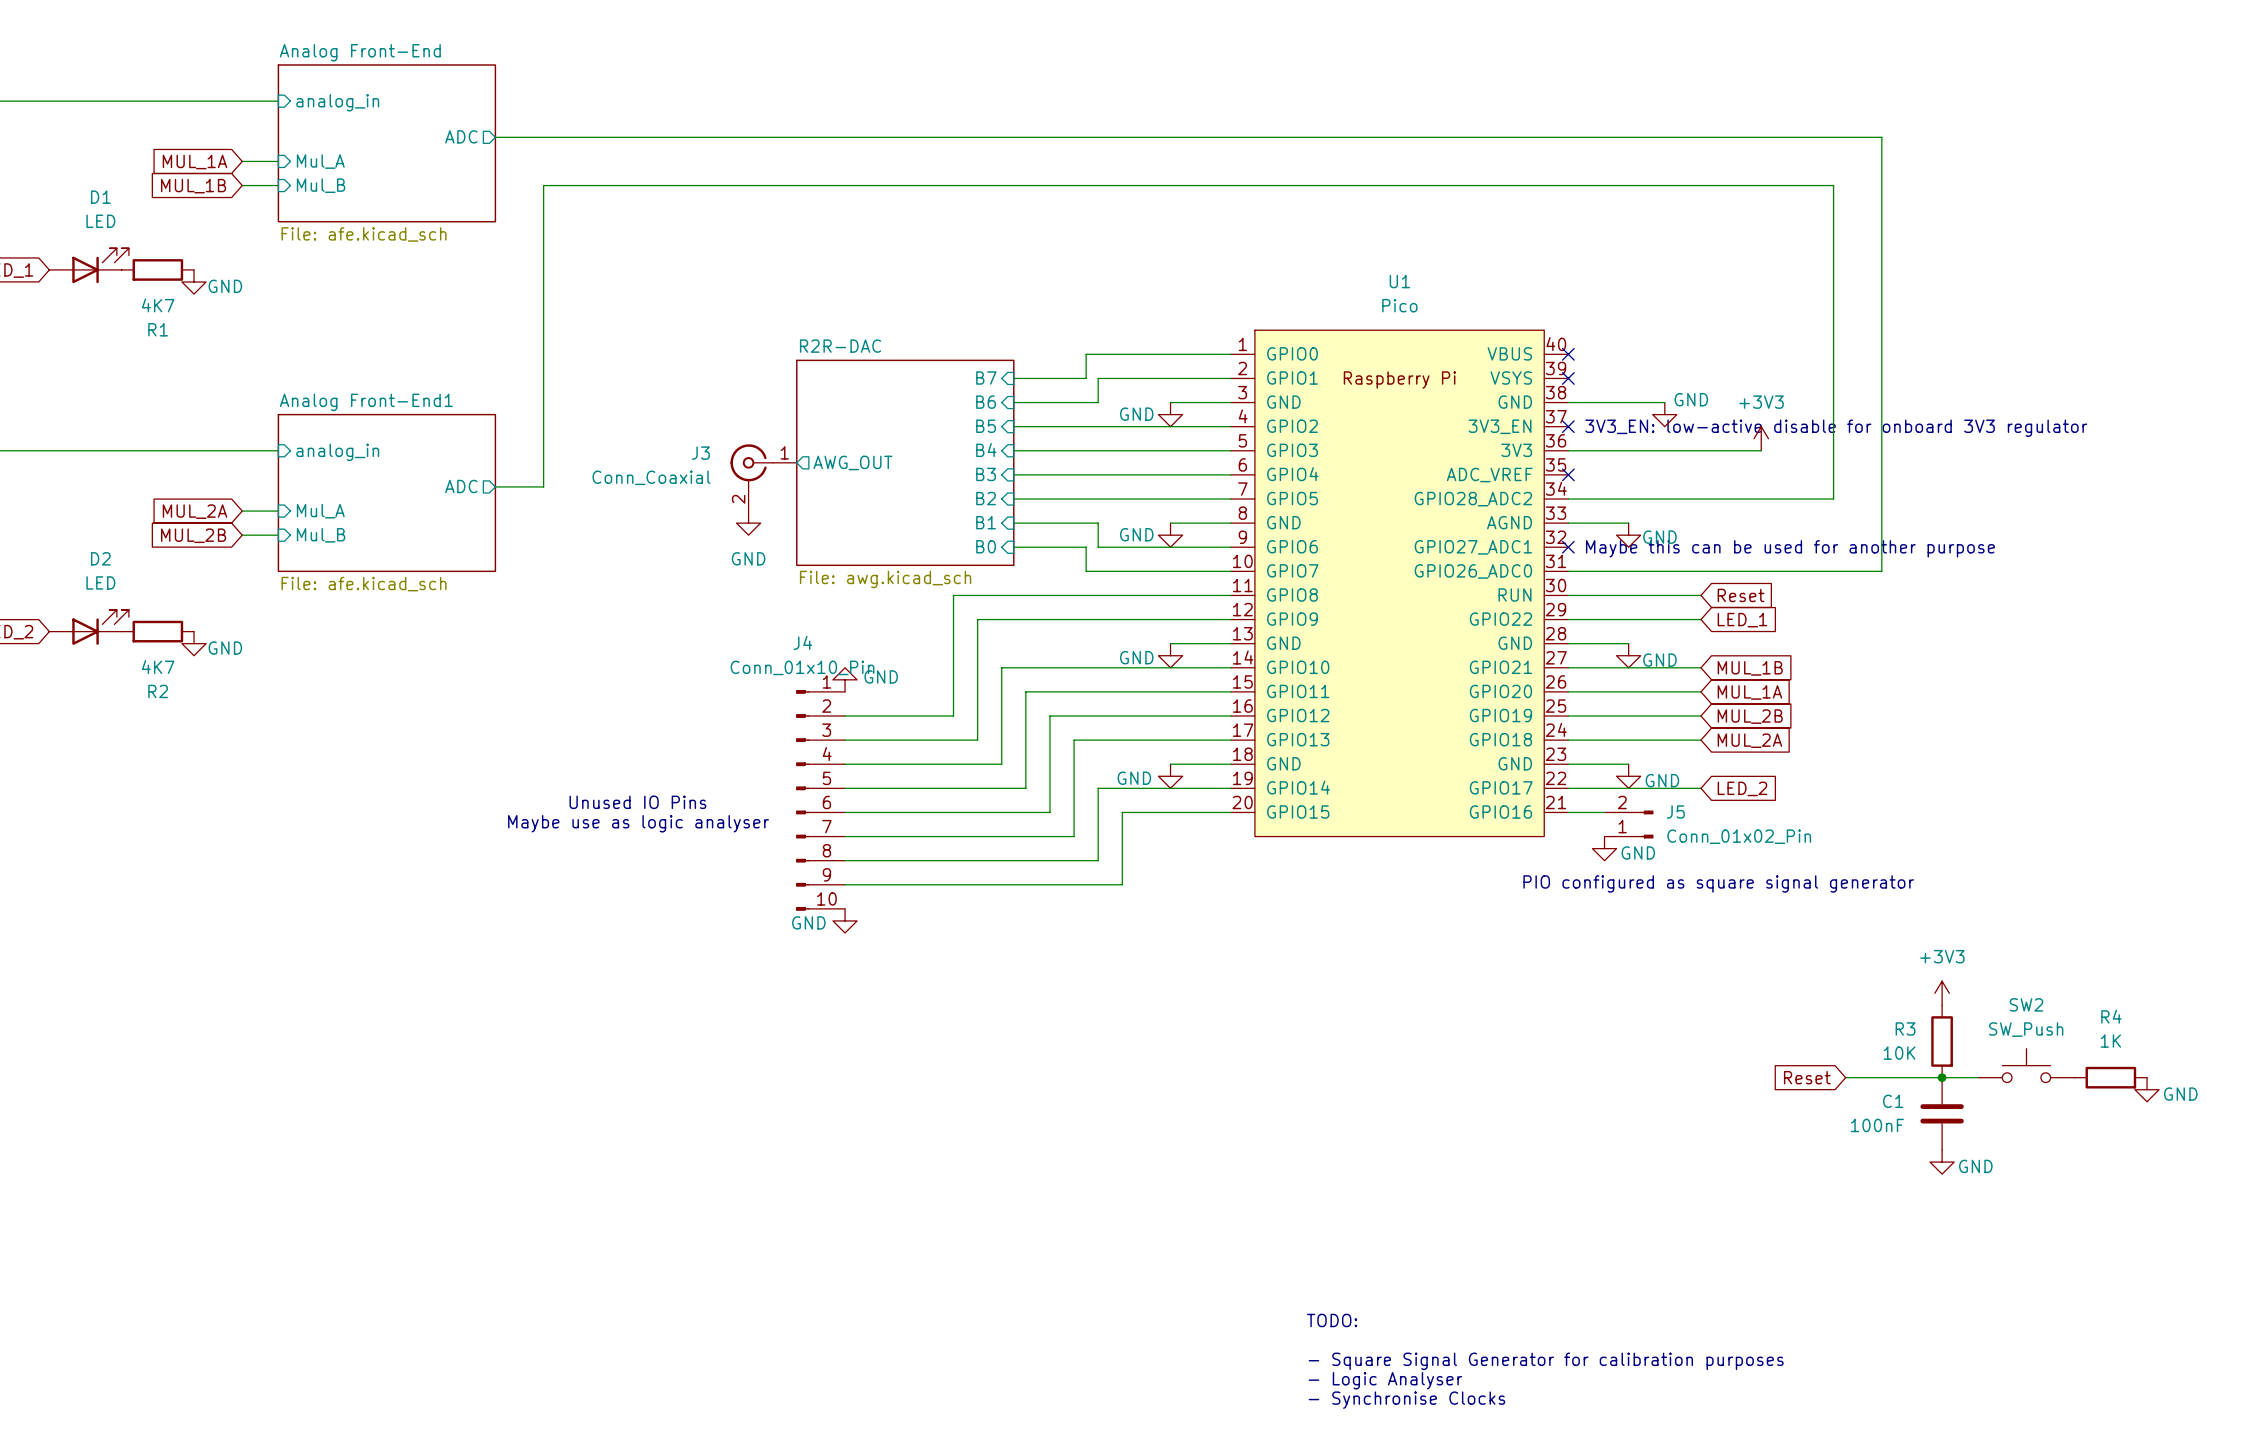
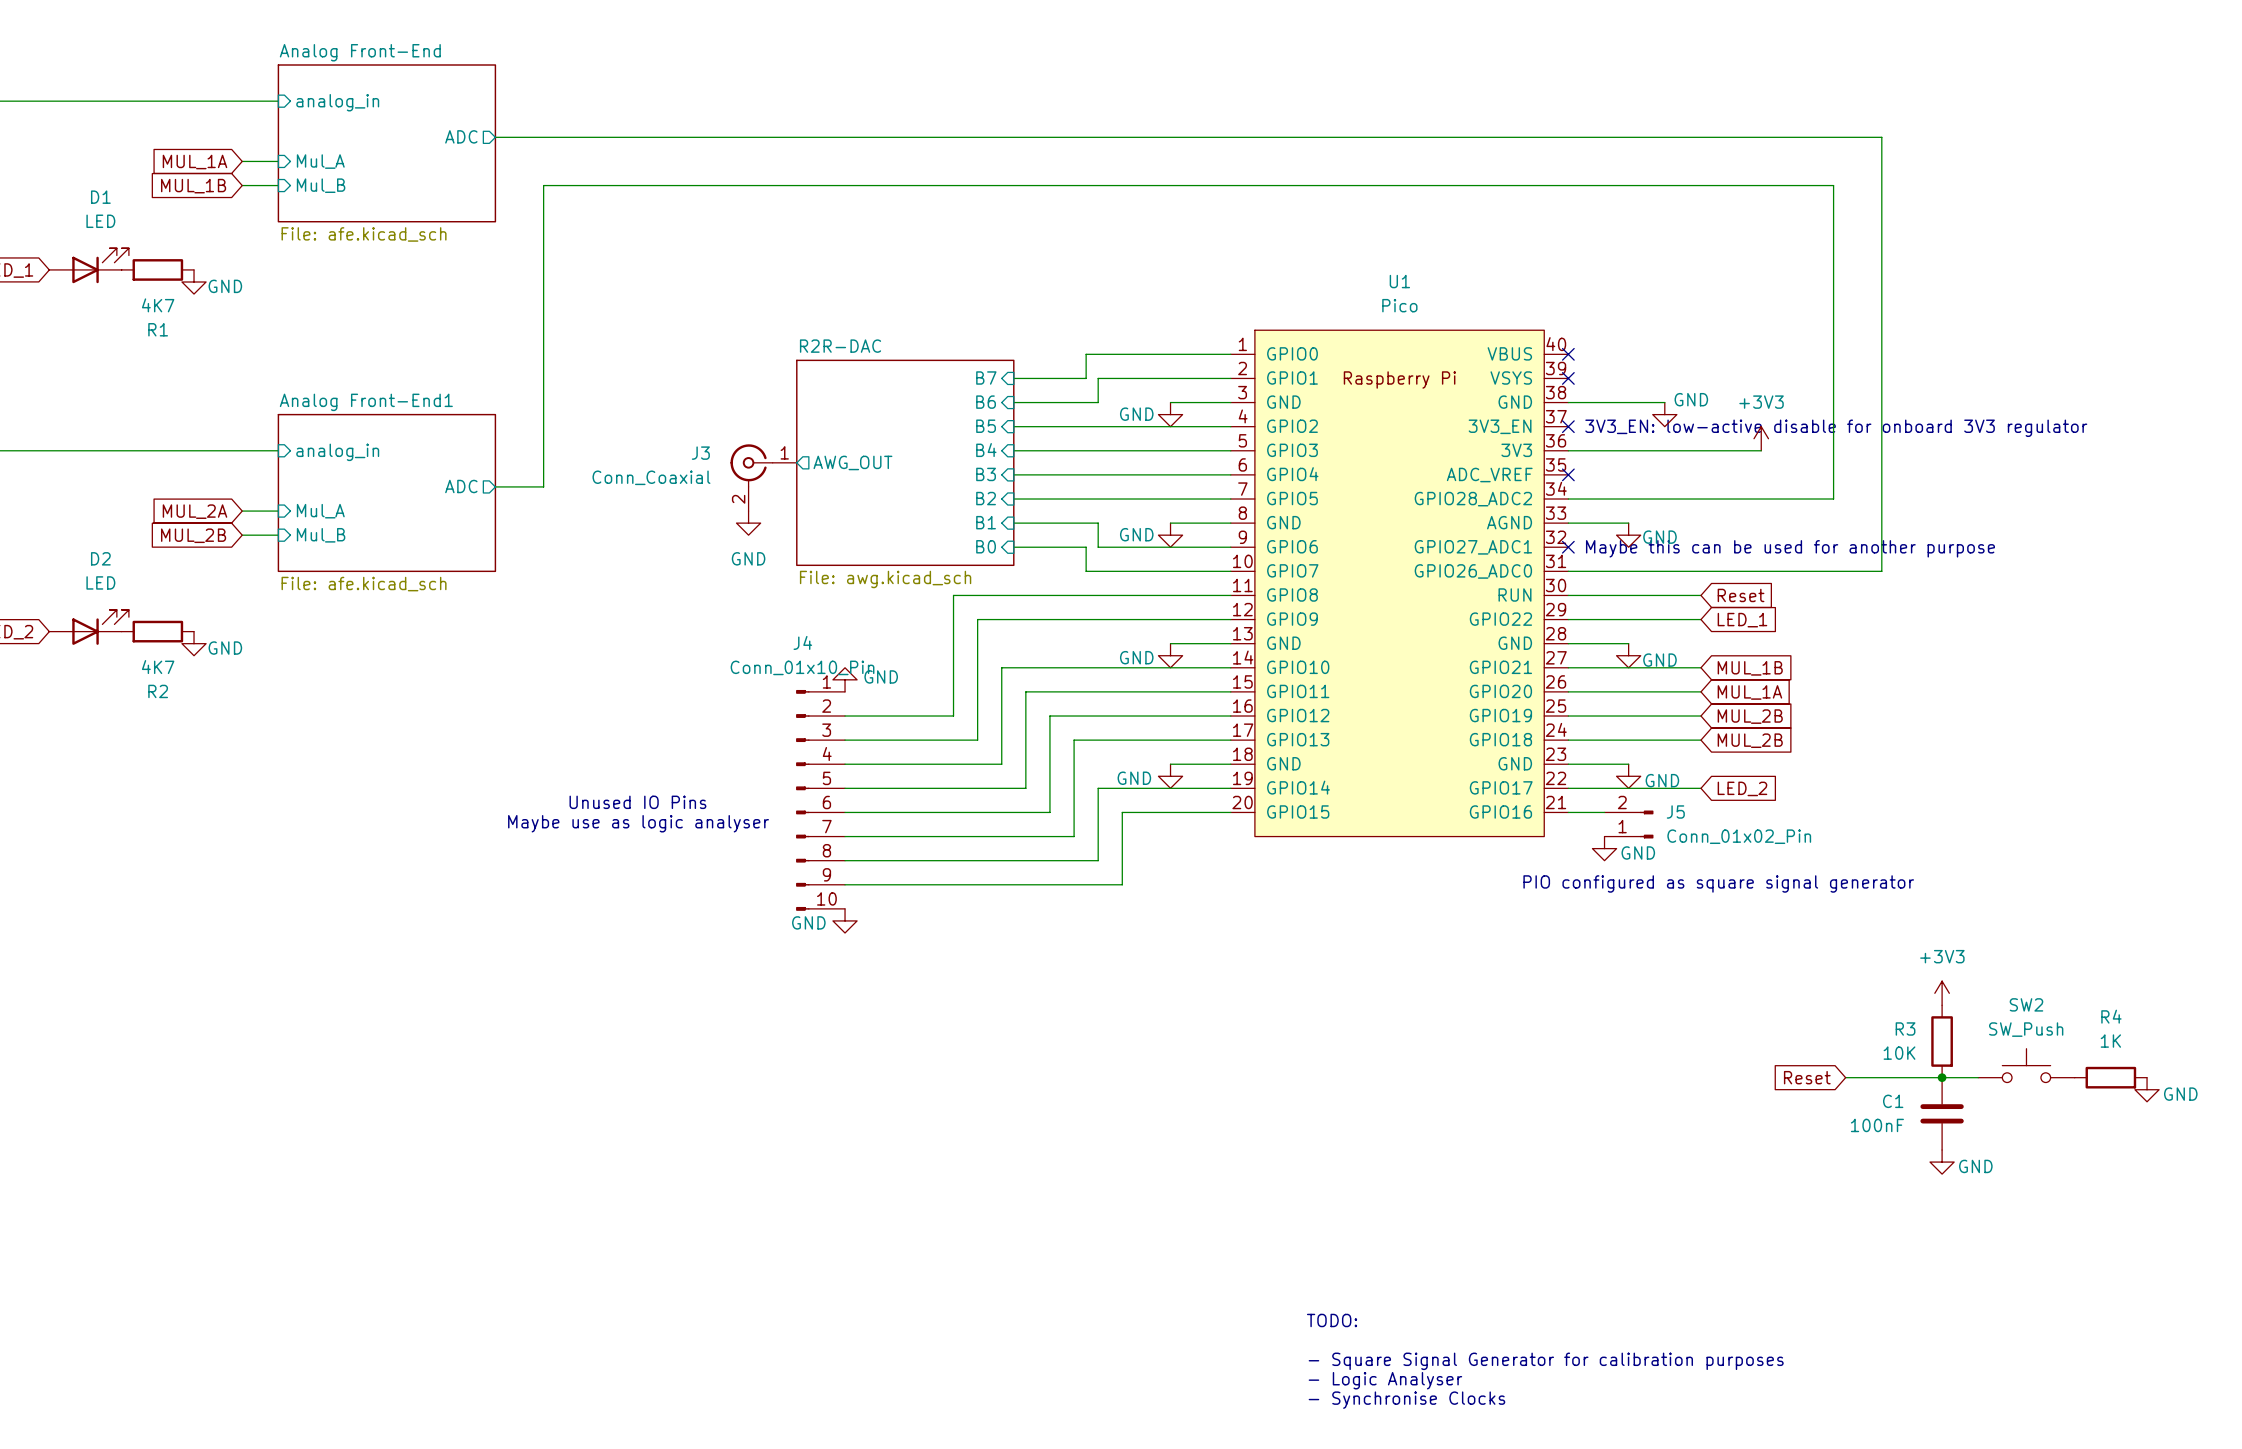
global label: MUL_2A (1749, 740) -> MUL_2B (1750, 740)

